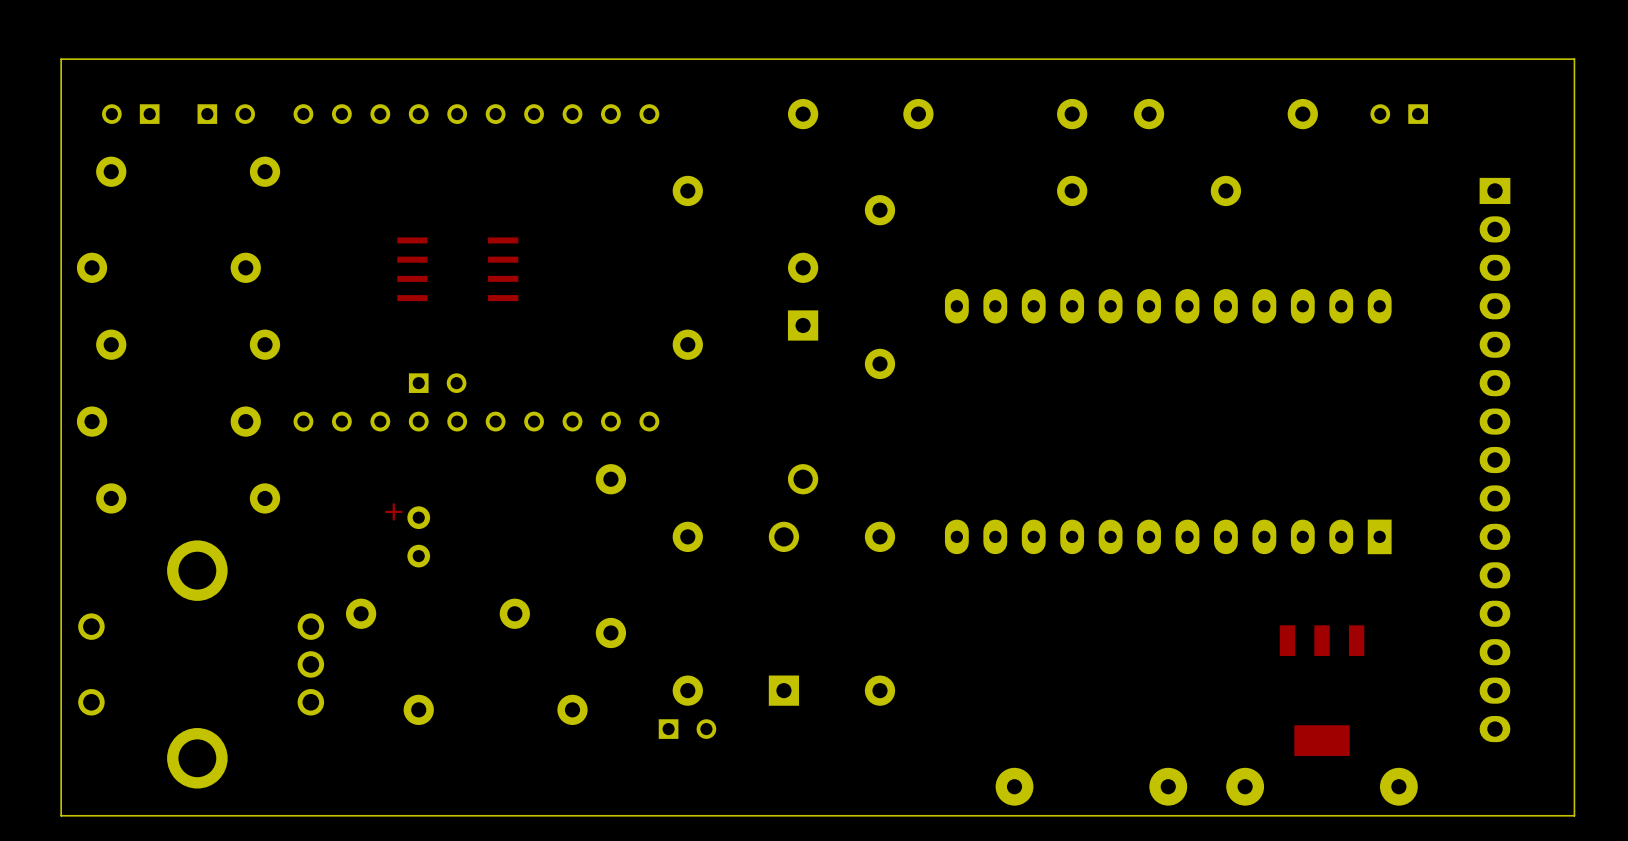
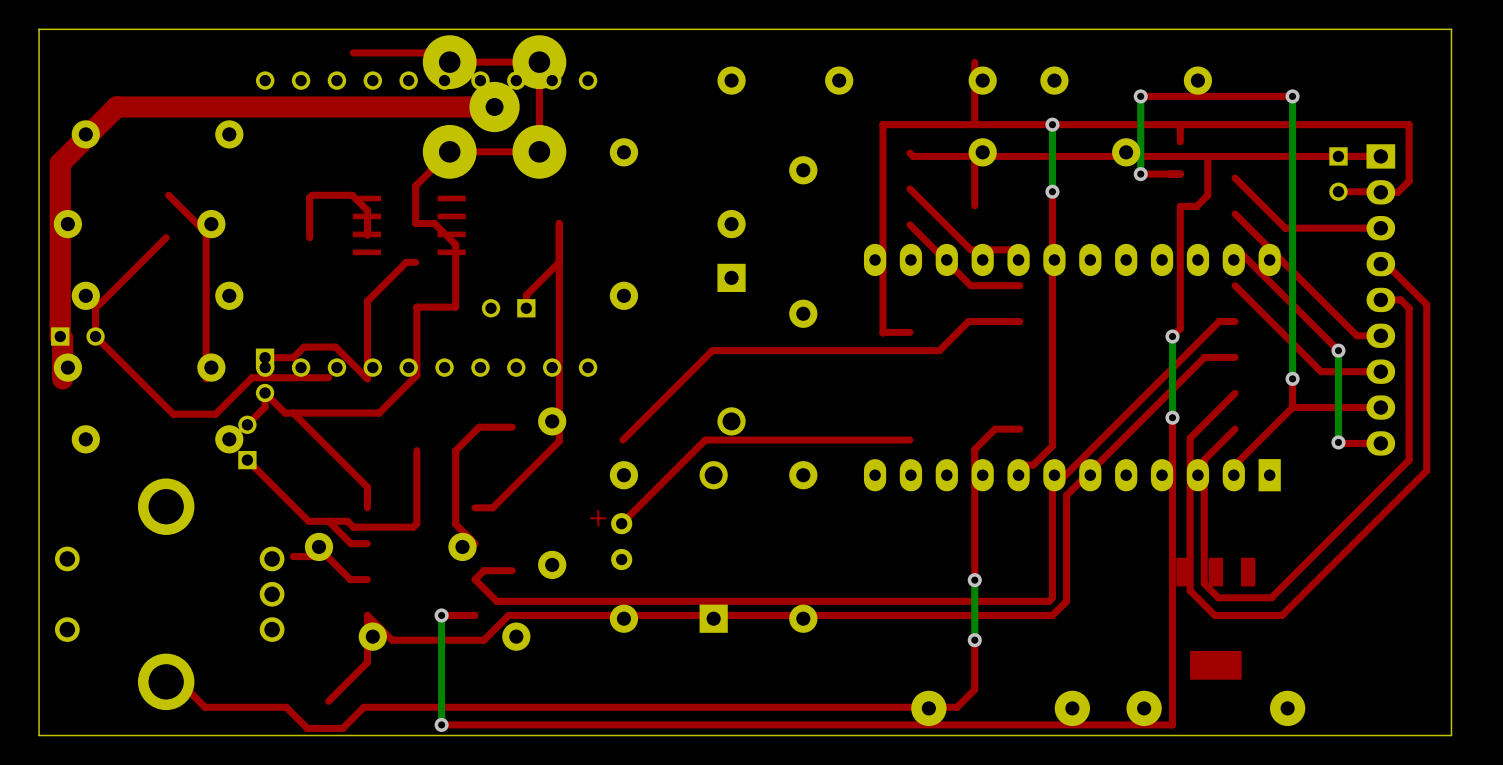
top track: none -> (353, 52) (440, 52) (449, 62) (539, 62) (539, 151) (449, 151) (415, 185) (415, 223) (434, 223) (455, 244) (455, 307) (416, 307) (416, 375) (379, 413) (285, 413) (265, 393) (265, 407) (247, 424)
top track: none -> (974, 62) (974, 124)
part: (130, 114) -> none
part: (226, 114) -> none
part rotation: 0° (1399, 114) -> 90° counterclockwise (1338, 174)
part position: (1399, 114) -> (1338, 174)
bottom track: none -> (1140, 96) (1140, 174)
via: none -> (1140, 96)
top track: none -> (1292, 96) (1140, 96)
bottom track: none -> (1292, 96) (1292, 378)
via: none -> (1292, 96)
top track: none -> (494, 107) (116, 107) (60, 163) (60, 336) (62, 338) (62, 378)
part: none -> (494, 107)
bottom track: none -> (1052, 124) (1052, 191)
via: none -> (1052, 124)
top track: none -> (1180, 124) (1180, 141)
top track: none -> (909, 153) (913, 156) (1380, 156)
top track: none -> (974, 156) (974, 205)
top track: none -> (1207, 156) (1207, 195) (1196, 206) (1180, 206) (1180, 328) (1172, 336)
via: none -> (1140, 174)
top track: none -> (1180, 174) (1140, 174)
top track: none -> (1235, 178) (1285, 228) (1380, 228)
top track: none -> (909, 188) (970, 249) (1019, 249)
top track: none -> (1052, 191) (1052, 445) (1033, 465) (1019, 465)
via: none -> (1052, 191)
top track: none -> (1338, 191) (1397, 192) (1409, 181) (1409, 124) (882, 124) (882, 332) (909, 332)
top track: none -> (168, 195) (206, 232) (206, 378)
top track: none -> (1235, 213) (1356, 335) (1380, 335)
top track: none -> (559, 223) (559, 441) (492, 507) (475, 507)
top track: none -> (909, 224) (970, 285) (1019, 285)
top track: none -> (367, 235) (367, 210) (352, 195) (312, 195) (309, 197) (309, 237)
top track: none -> (166, 237) (95, 308) (95, 336) (173, 414) (215, 414) (252, 377) (328, 377)
top track: none -> (1235, 249) (1237, 249) (1338, 350)
top track: none -> (415, 262) (406, 262) (367, 301) (367, 378) (335, 347) (303, 347) (293, 357) (265, 357)
top track: none -> (559, 262) (526, 295) (526, 308)
top track: none -> (1386, 264) (1426, 304) (1426, 470) (1281, 615) (1214, 615) (1190, 590) (1190, 438) (1235, 393)
top track: none -> (1235, 285) (1321, 371) (1380, 371)
top track: none -> (1380, 299) (1400, 299) (1409, 308) (1409, 460) (1271, 597) (1218, 597) (1204, 583) (1204, 459) (1235, 429)
part: none -> (1380, 299)
part: none -> (508, 308)
top track: none -> (1019, 321) (968, 321) (939, 350) (712, 350) (622, 440)
top track: none -> (1235, 321) (1219, 321) (1052, 488) (1052, 597) (1048, 601) (496, 601) (475, 579) (483, 570) (512, 570)
part: (437, 383) -> none
part: none -> (77, 336)
bottom track: none -> (1172, 336) (1172, 417)
via: none -> (1172, 336)
bottom track: none -> (1338, 350) (1338, 442)
via: none -> (1338, 350)
top track: none -> (1235, 357) (1204, 357) (1066, 495) (1066, 601) (1052, 615) (508, 615) (483, 640) (392, 640) (367, 615) (367, 662) (328, 701)
part: none -> (265, 375)
top track: none -> (1292, 378) (1292, 407)
via: none -> (1292, 378)
part: (1494, 460) -> none
top track: none -> (1292, 407) (1235, 465)
top track: none -> (1380, 407) (1292, 407)
top track: none -> (293, 413) (367, 487) (367, 507)
top track: none -> (1172, 417) (1172, 724) (441, 724)
via: none -> (1172, 417)
top track: none -> (512, 427) (479, 427) (455, 450) (455, 524) (475, 543)
top track: none -> (1019, 429) (995, 429) (974, 449) (974, 580)
top track: none -> (909, 440) (705, 440) (621, 523)
part: none -> (247, 442)
top track: none -> (1338, 442) (1380, 443)
via: none -> (1338, 442)
top track: none -> (416, 450) (416, 523) (413, 527) (353, 527) (347, 521) (308, 521) (247, 460)
part position: (407, 535) -> (611, 540)
top track: none -> (328, 521) (351, 543) (367, 543)
top track: none -> (293, 556) (327, 556) (350, 579) (367, 579)
bottom track: none -> (974, 580) (974, 640)
via: none -> (974, 580)
bottom track: none -> (441, 615) (441, 724)
via: none -> (441, 615)
top track: none -> (475, 615) (441, 615)
top track: none -> (974, 640) (974, 689) (957, 707) (363, 707) (342, 728) (307, 728) (286, 707) (205, 707) (187, 689)
via: none -> (974, 640)
part: (687, 729) -> none
via: none -> (441, 724)

